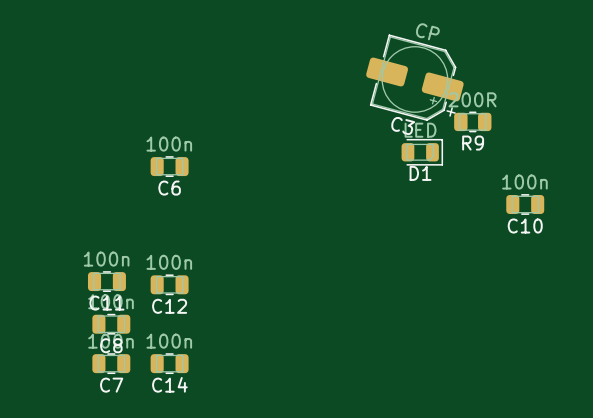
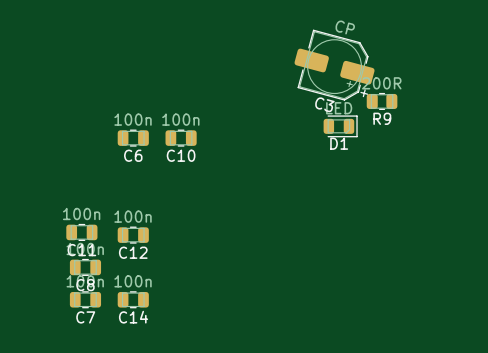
C10 position: (525, 204) -> (181, 138)

